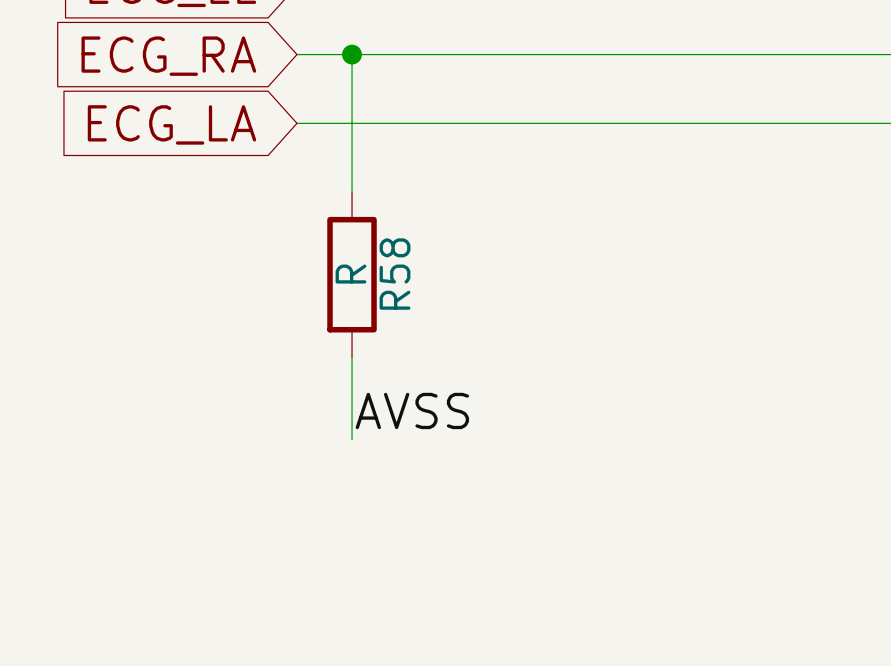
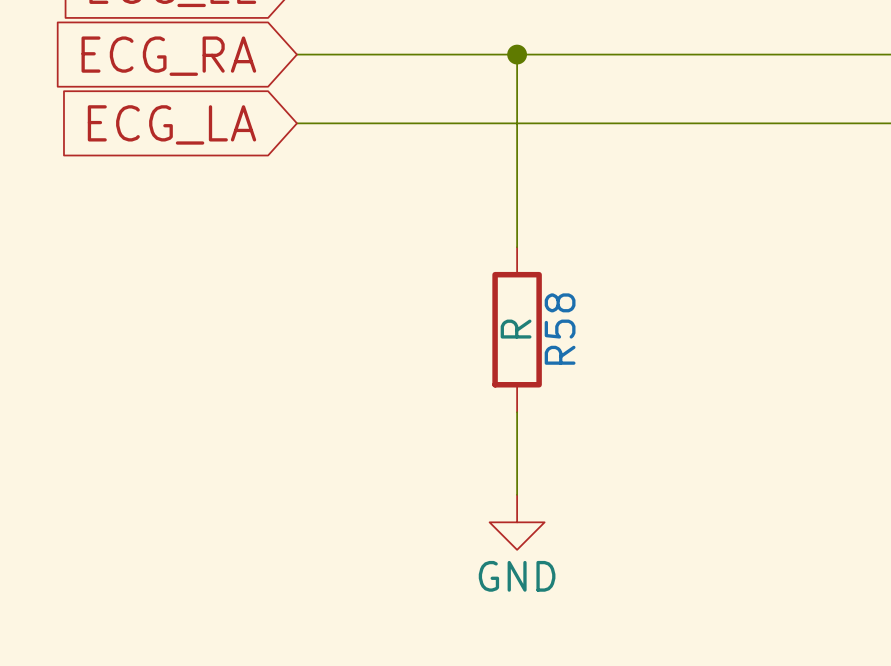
wire: (352, 54) (352, 192) -> none
junction: (352, 54) -> none
wire: none -> (517, 54) (517, 247)
junction: none -> (517, 54)
R58 position: (352, 274) -> (517, 329)
wire: (352, 357) (352, 439) -> (517, 412) (517, 494)
label: AVSS (412, 410) -> none
power symbol: none -> GND (517, 522)

